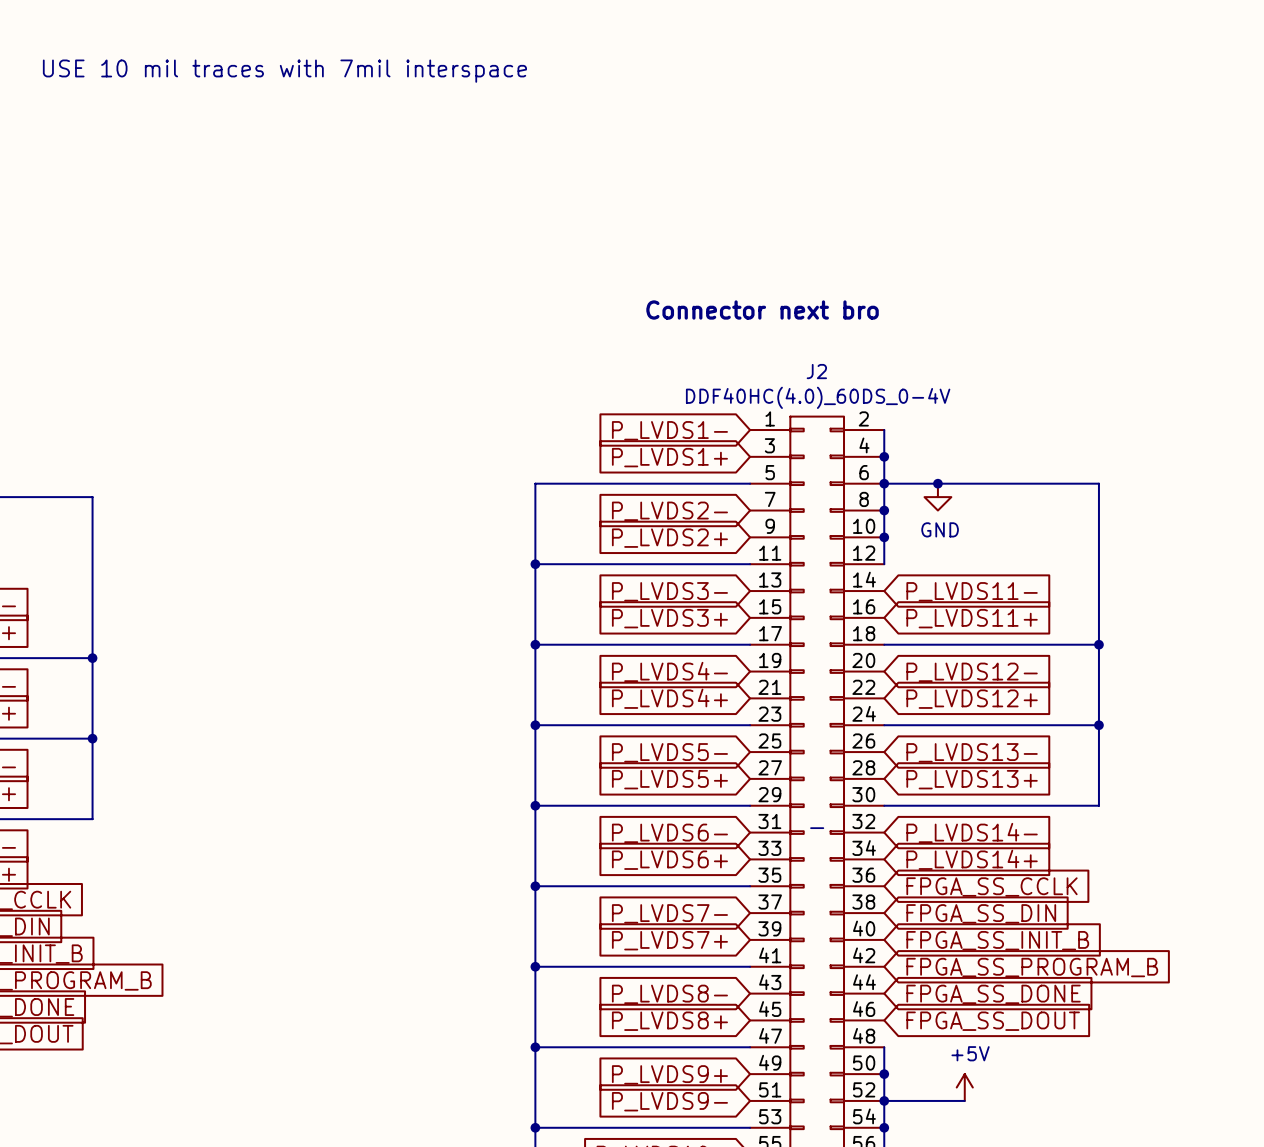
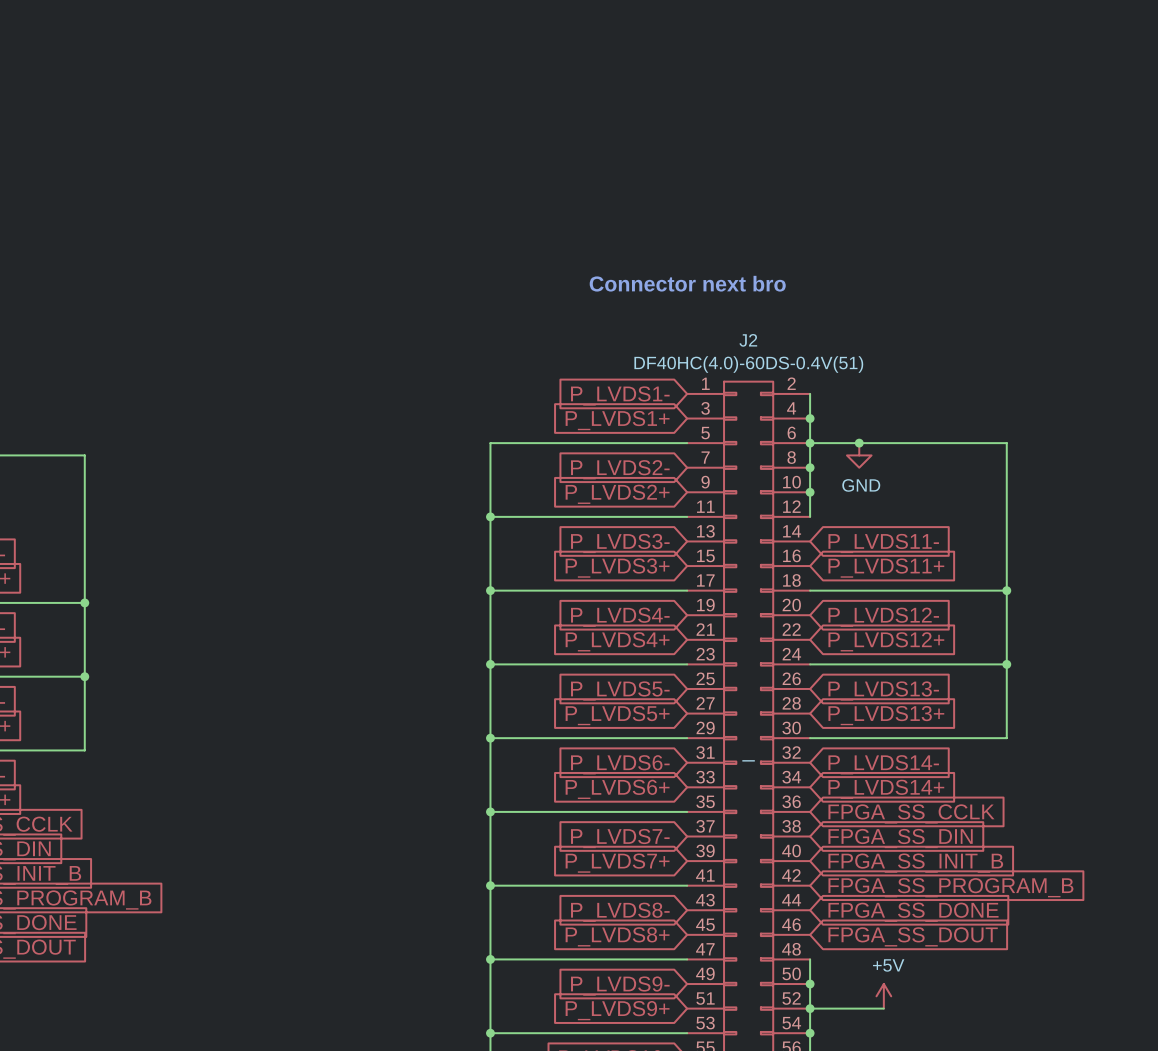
text: USE 10 mil traces with 7mil interspace (284, 71) -> none
J2 value: DDF40HC(4.0)_60DS_0-4V (818, 397) -> DF40HC(4.0)-60DS-0.4V(51) (748, 364)
global label: P_LVDS9+ (669, 1074) -> P_LVDS9- (620, 986)
global label: P_LVDS9- (669, 1101) -> P_LVDS9+ (617, 1010)

